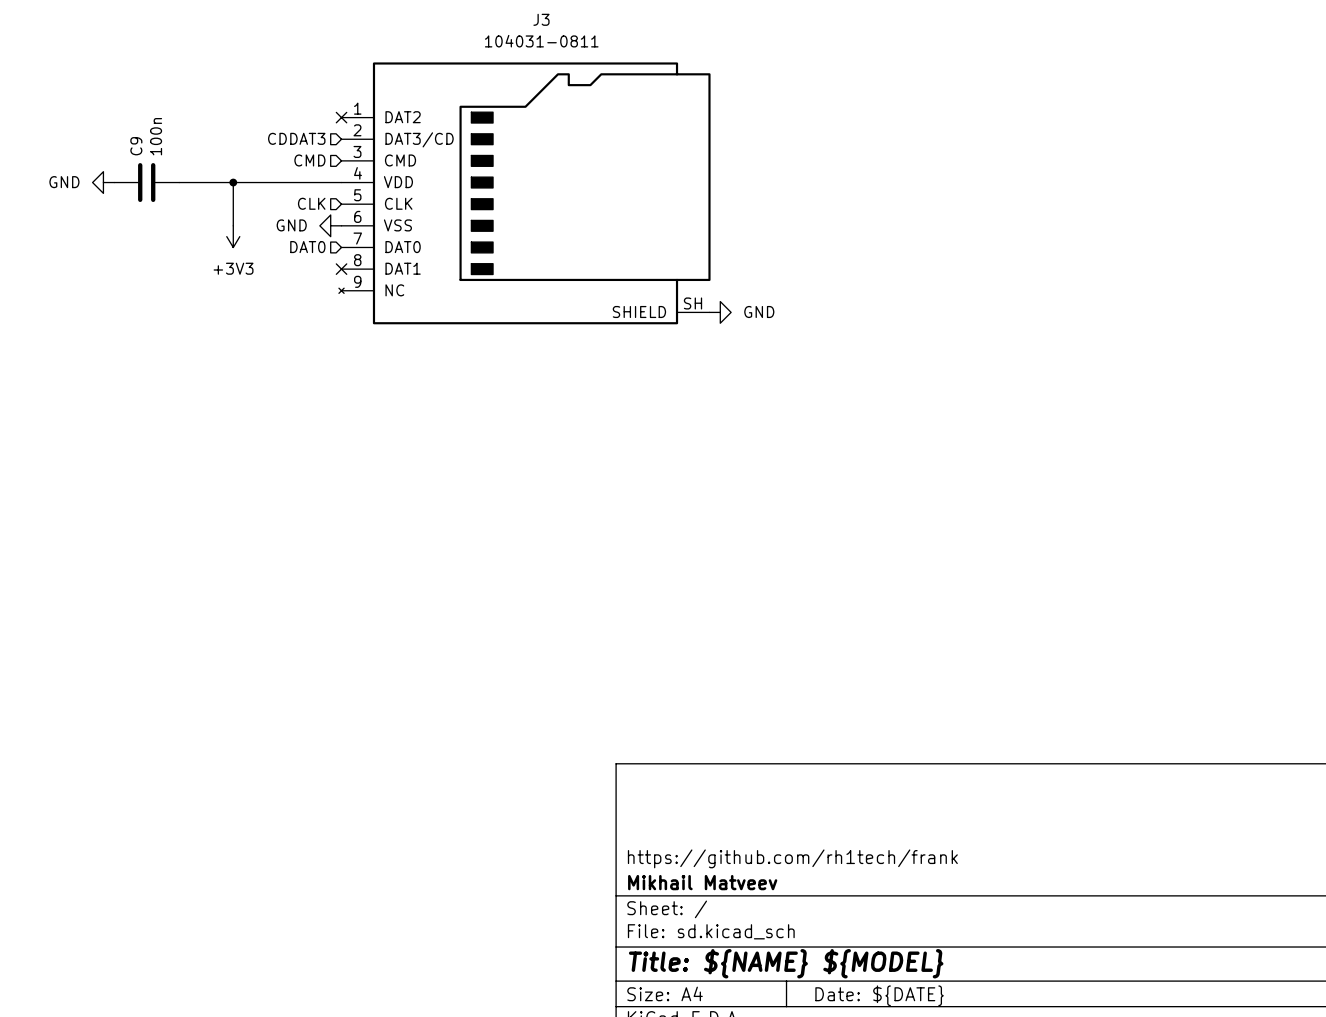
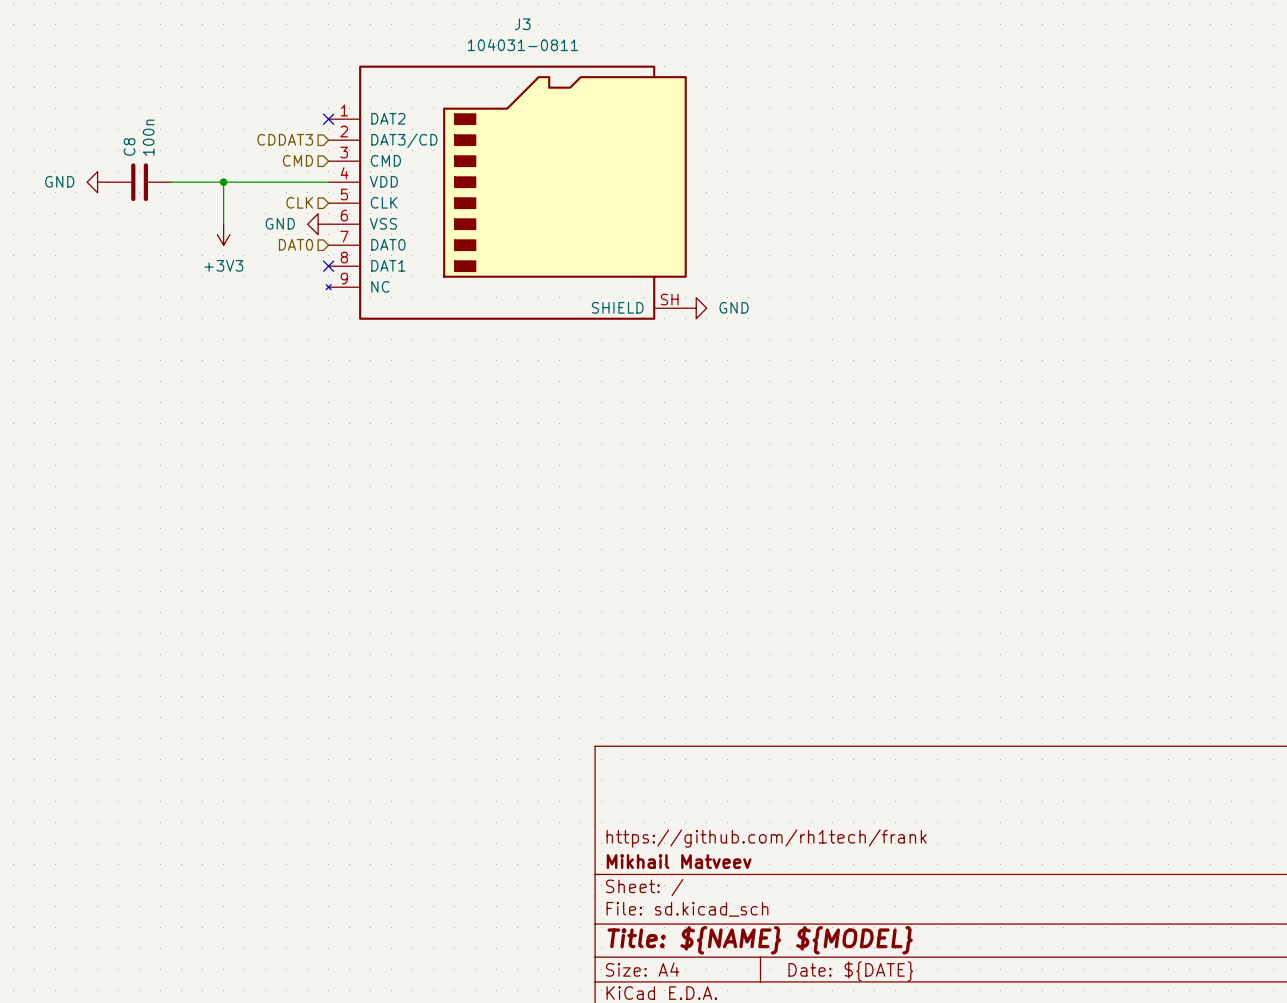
C9 name: C9 (136, 146) -> C8 (129, 146)

